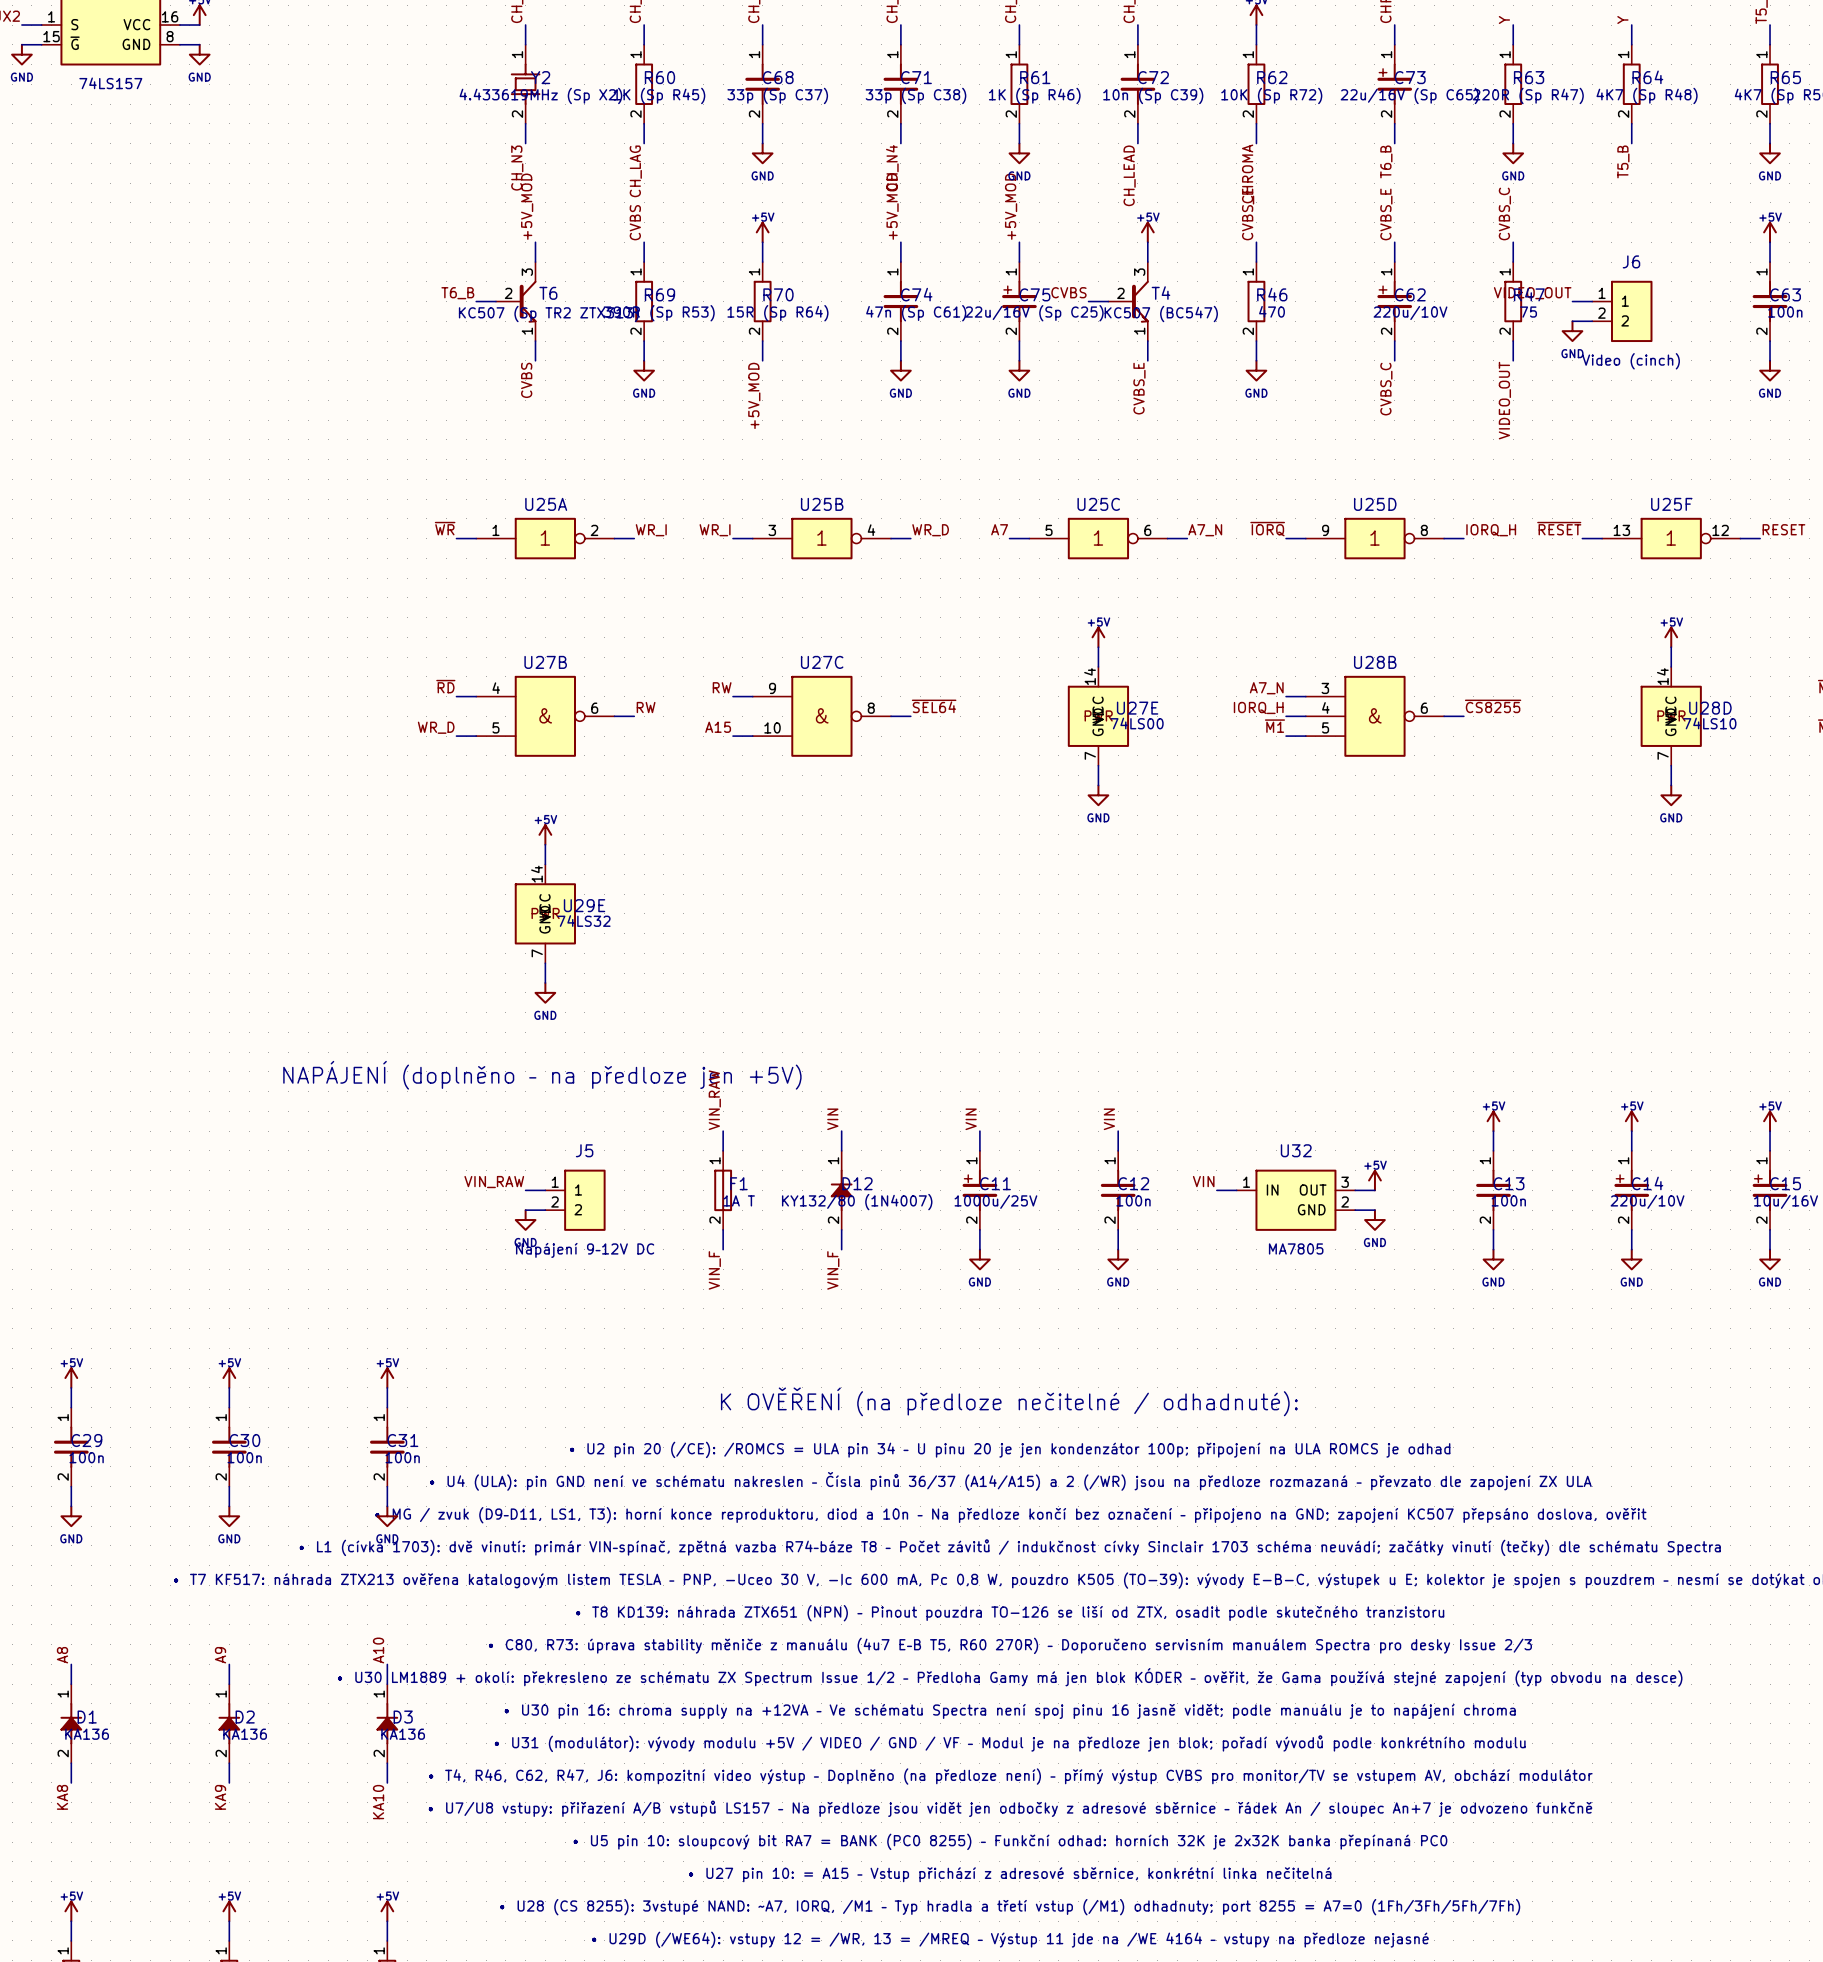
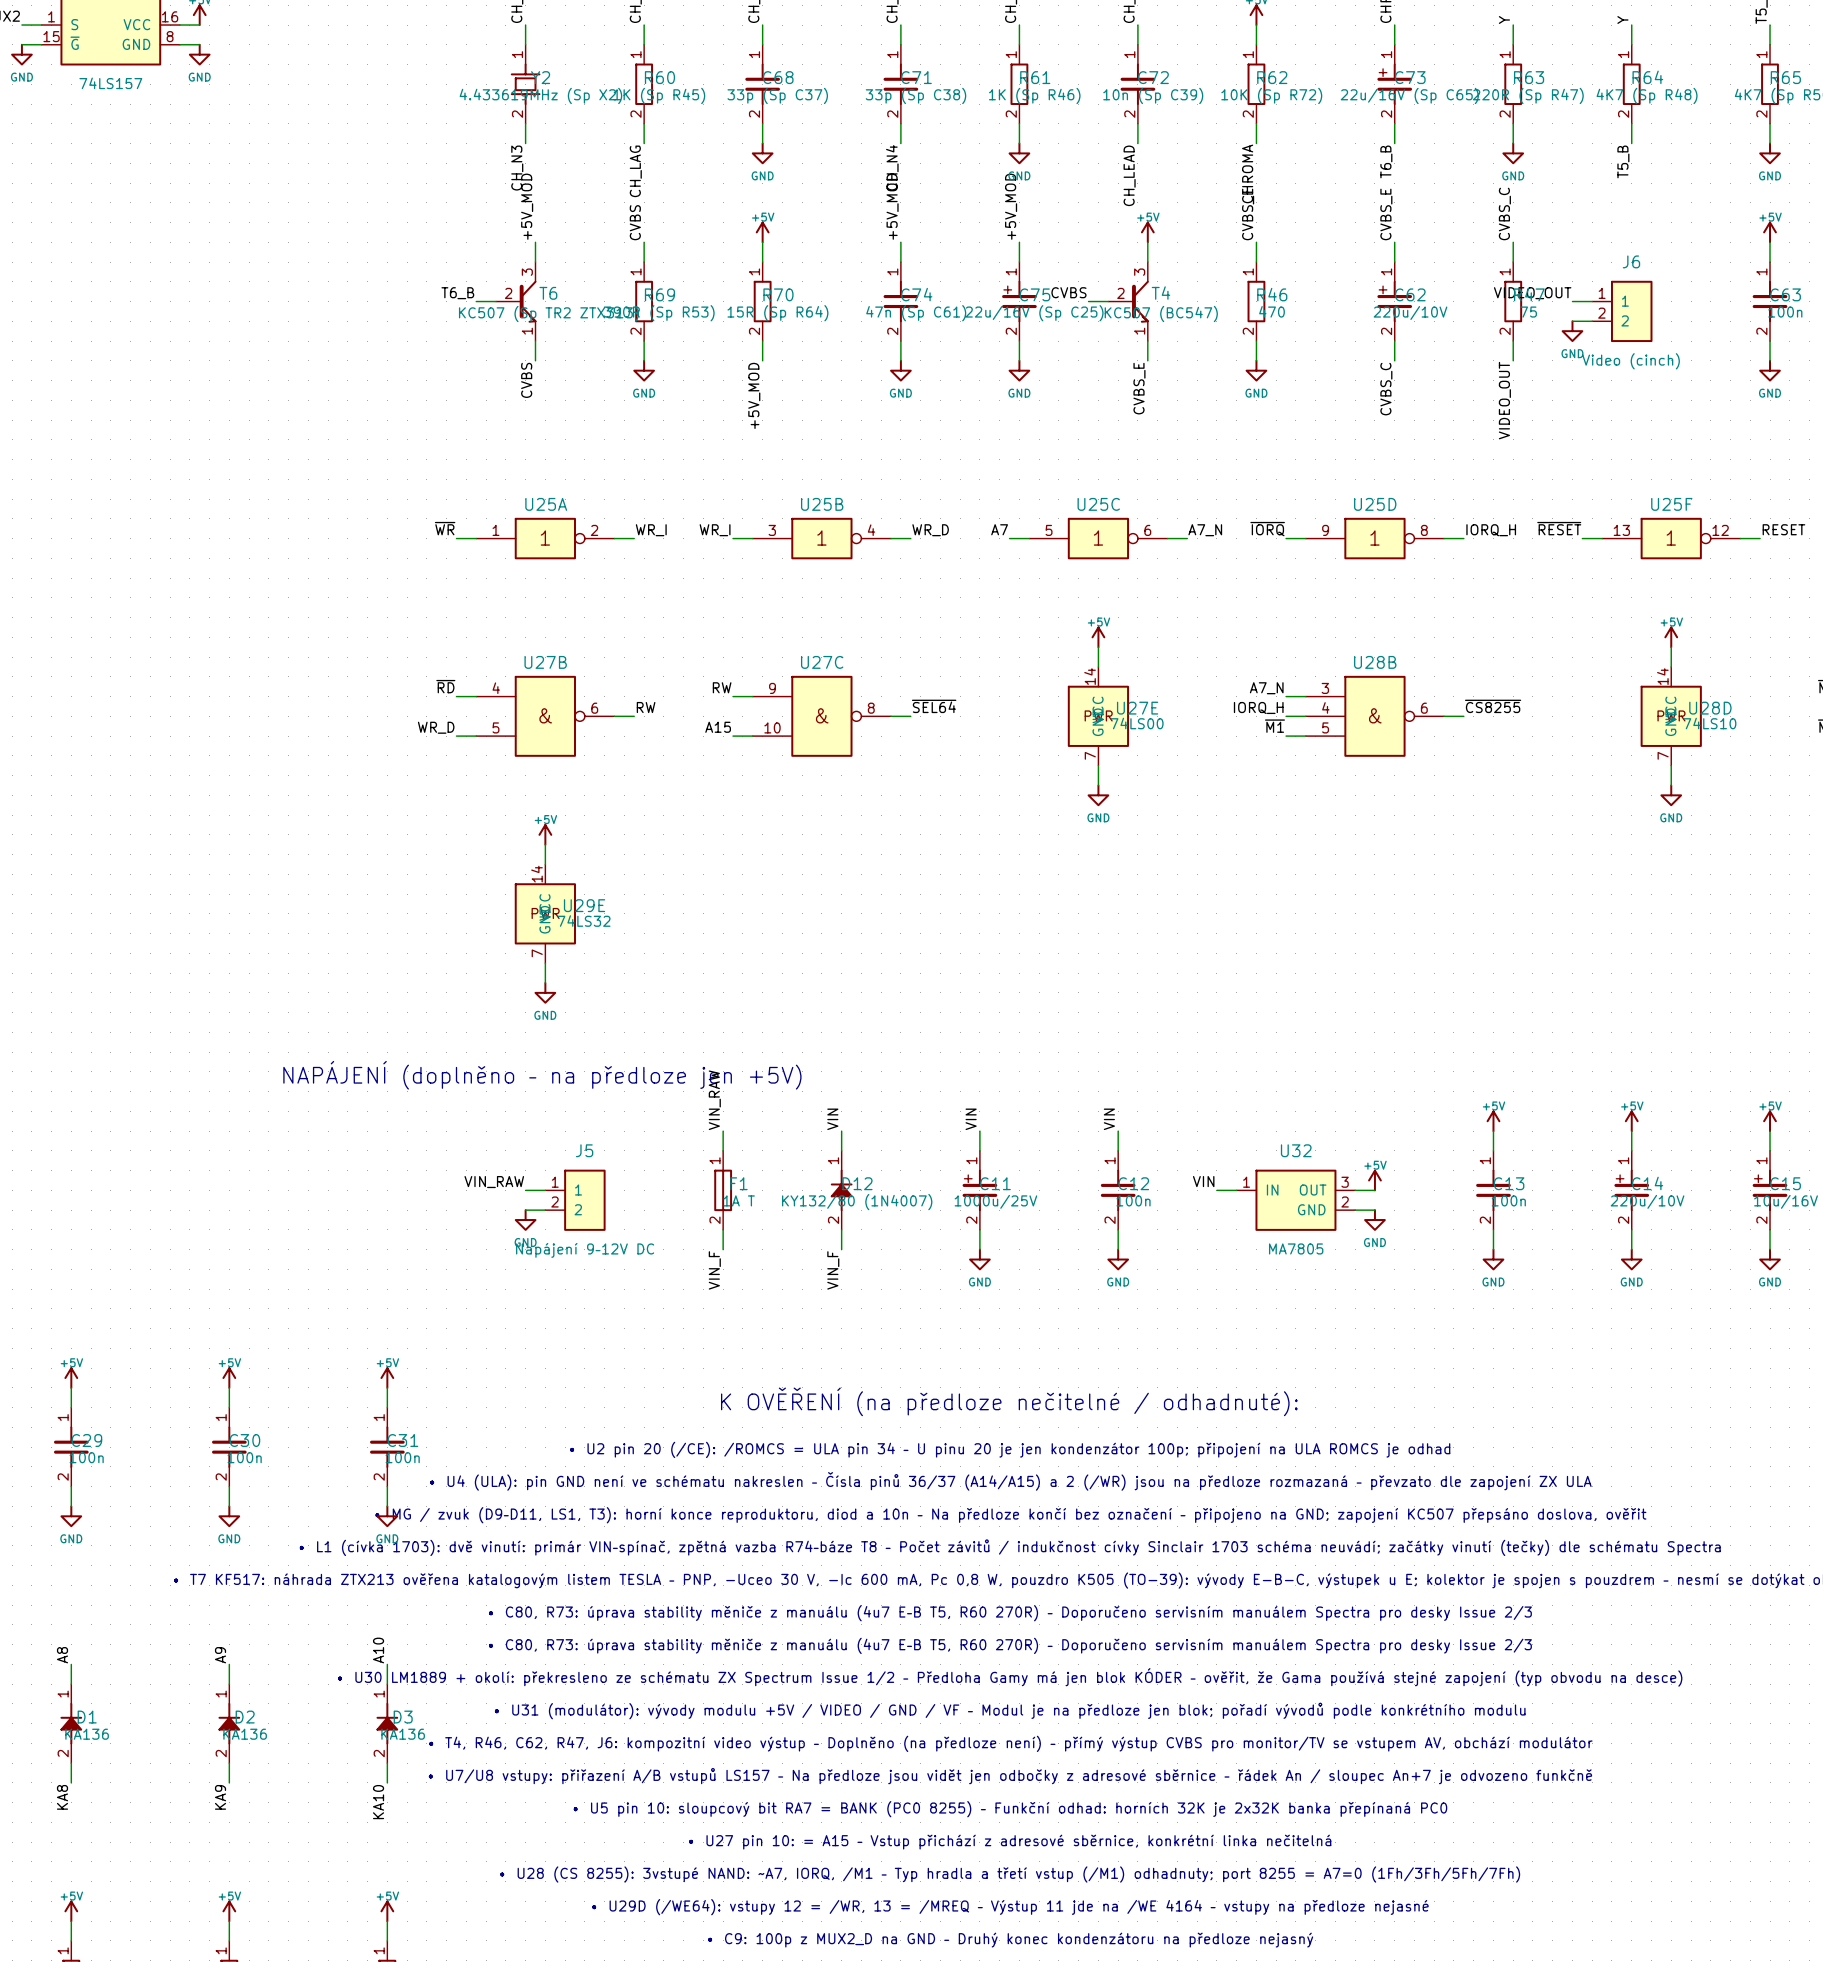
text: • T8 KD139: náhrada ZTX651 (NPN) – Pinout pouzdra TO-126 se liší od ZTX, osadit podle skutečného tranzistoru (1010, 1613) -> • C80, R73: úprava stability měniče z manuálu (4u7 E–B T5, R60 270R) – Doporučeno servisním manuálem Spectra pro desky Issue 2/3 (1010, 1613)
text: • U30 pin 16: chroma supply na +12VA – Ve schématu Spectra není spoj pinu 16 jasně vidět; podle manuálu je to napájení chroma (1010, 1711) -> • U31 (modulátor): vývody modulu +5V / VIDEO / GND / VF – Modul je na předloze jen blok; pořadí vývodů podle konkrétního modulu (1010, 1710)
text: • U31 (modulátor): vývody modulu +5V / VIDEO / GND / VF – Modul je na předloze jen blok; pořadí vývodů podle konkrétního modulu (1010, 1743) -> • T4, R46, C62, R47, J6: kompozitní video výstup – Doplněno (na předloze není) – přímý výstup CVBS pro monitor/TV se vstupem AV, obchází modulátor (1010, 1743)
text: • T4, R46, C62, R47, J6: kompozitní video výstup – Doplněno (na předloze není) – přímý výstup CVBS pro monitor/TV se vstupem AV, obchází modulátor (1010, 1776) -> • U7/U8 vstupy: přiřazení A/B vstupů LS157 – Na předloze jsou vidět jen odbočky z adresové sběrnice – řádek An / sloupec An+7 je odvozeno funkčně (1010, 1776)
text: • U7/U8 vstupy: přiřazení A/B vstupů LS157 – Na předloze jsou vidět jen odbočky z adresové sběrnice – řádek An / sloupec An+7 je odvozeno funkčně (1010, 1808) -> • U5 pin 10: sloupcový bit RA7 = BANK (PC0 8255) – Funkční odhad: horních 32K je 2x32K banka přepínaná PC0 (1010, 1809)
text: • U5 pin 10: sloupcový bit RA7 = BANK (PC0 8255) – Funkční odhad: horních 32K je 2x32K banka přepínaná PC0 (1010, 1841) -> • U27 pin 10: = A15 – Vstup přichází z adresové sběrnice, konkrétní linka nečitelná (1010, 1842)
text: • U27 pin 10: = A15 – Vstup přichází z adresové sběrnice, konkrétní linka nečitelná (1010, 1874) -> • U28 (CS 8255): 3vstupé NAND: ~A7, IORQ, /M1 – Typ hradla a třetí vstup (/M1) odhadnuty; port 8255 = A7=0 (1Fh/3Fh/5Fh/7Fh) (1010, 1874)
text: • U28 (CS 8255): 3vstupé NAND: ~A7, IORQ, /M1 – Typ hradla a třetí vstup (/M1) odhadnuty; port 8255 = A7=0 (1Fh/3Fh/5Fh/7Fh) (1010, 1907) -> • U29D (/WE64): vstupy 12 = /WR, 13 = /MREQ – Výstup 11 jde na /WE 4164 – vstupy na předloze nejasné (1010, 1907)
text: • U29D (/WE64): vstupy 12 = /WR, 13 = /MREQ – Výstup 11 jde na /WE 4164 – vstupy na předloze nejasné (1010, 1939) -> • C9: 100p z MUX2_D na GND – Druhý konec kondenzátoru na předloze nejasný (1010, 1940)

